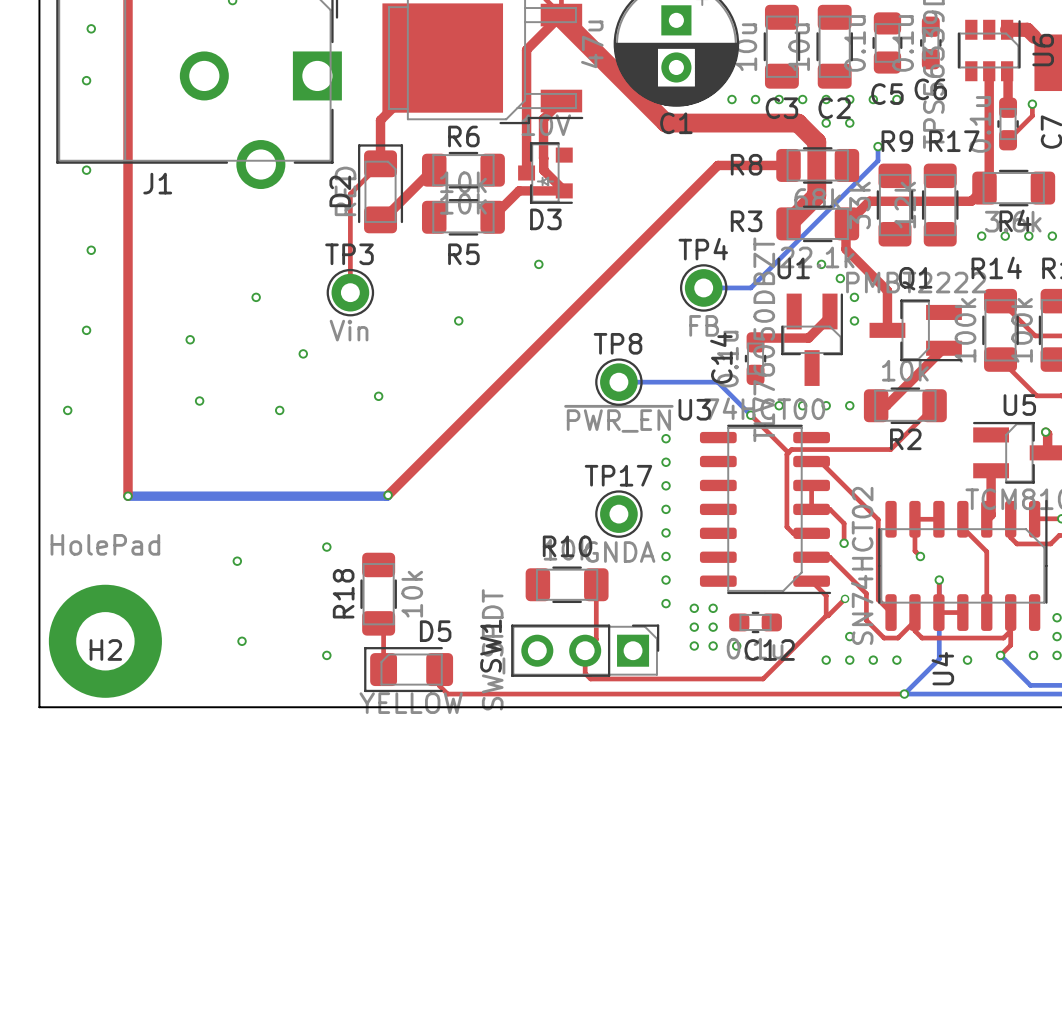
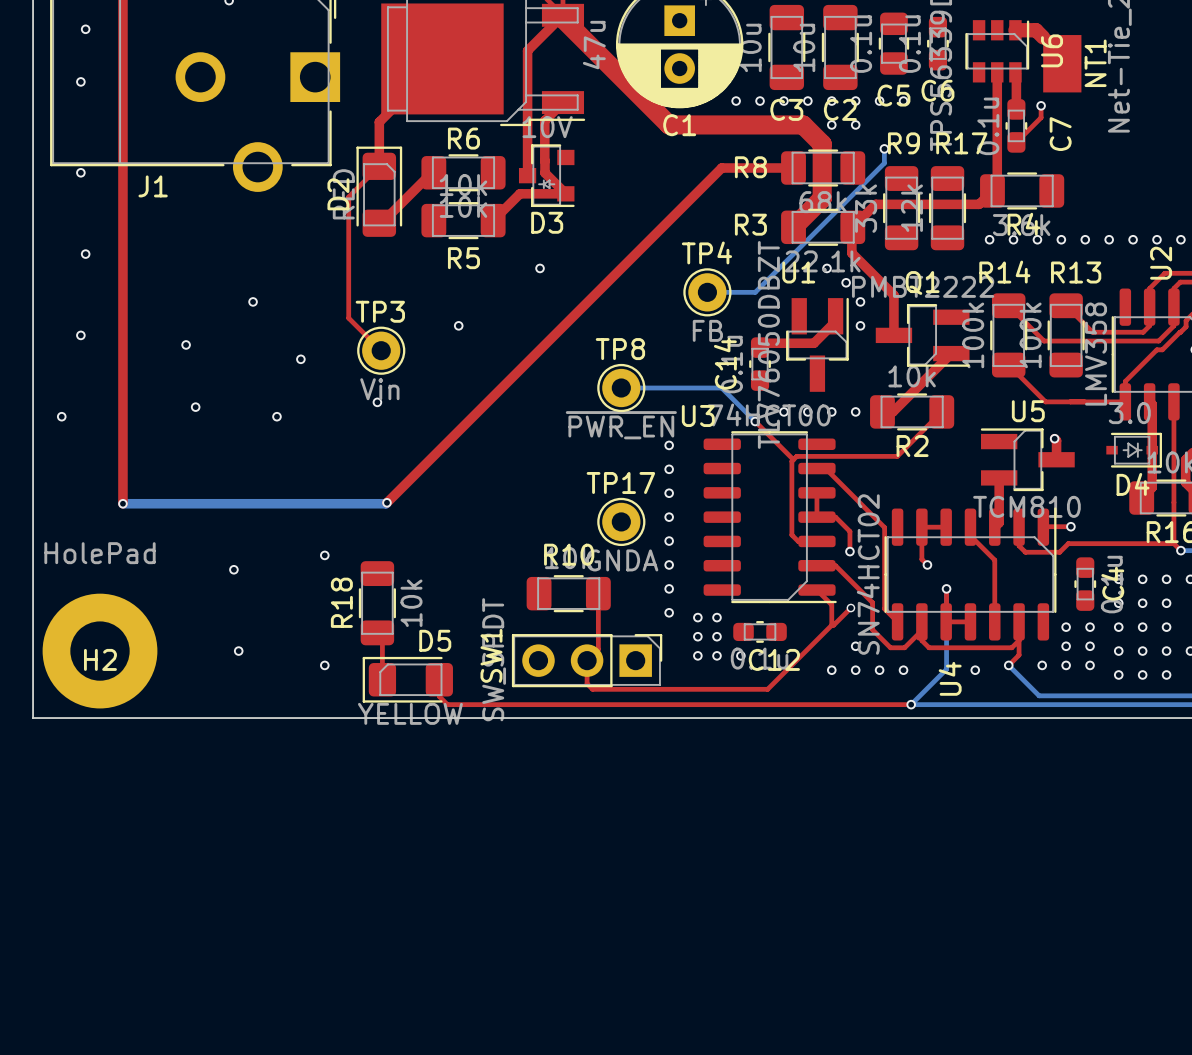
top track: none -> (348, 297) (348, 318) (381, 350)
TP3 position: (350, 292) -> (381, 350)

